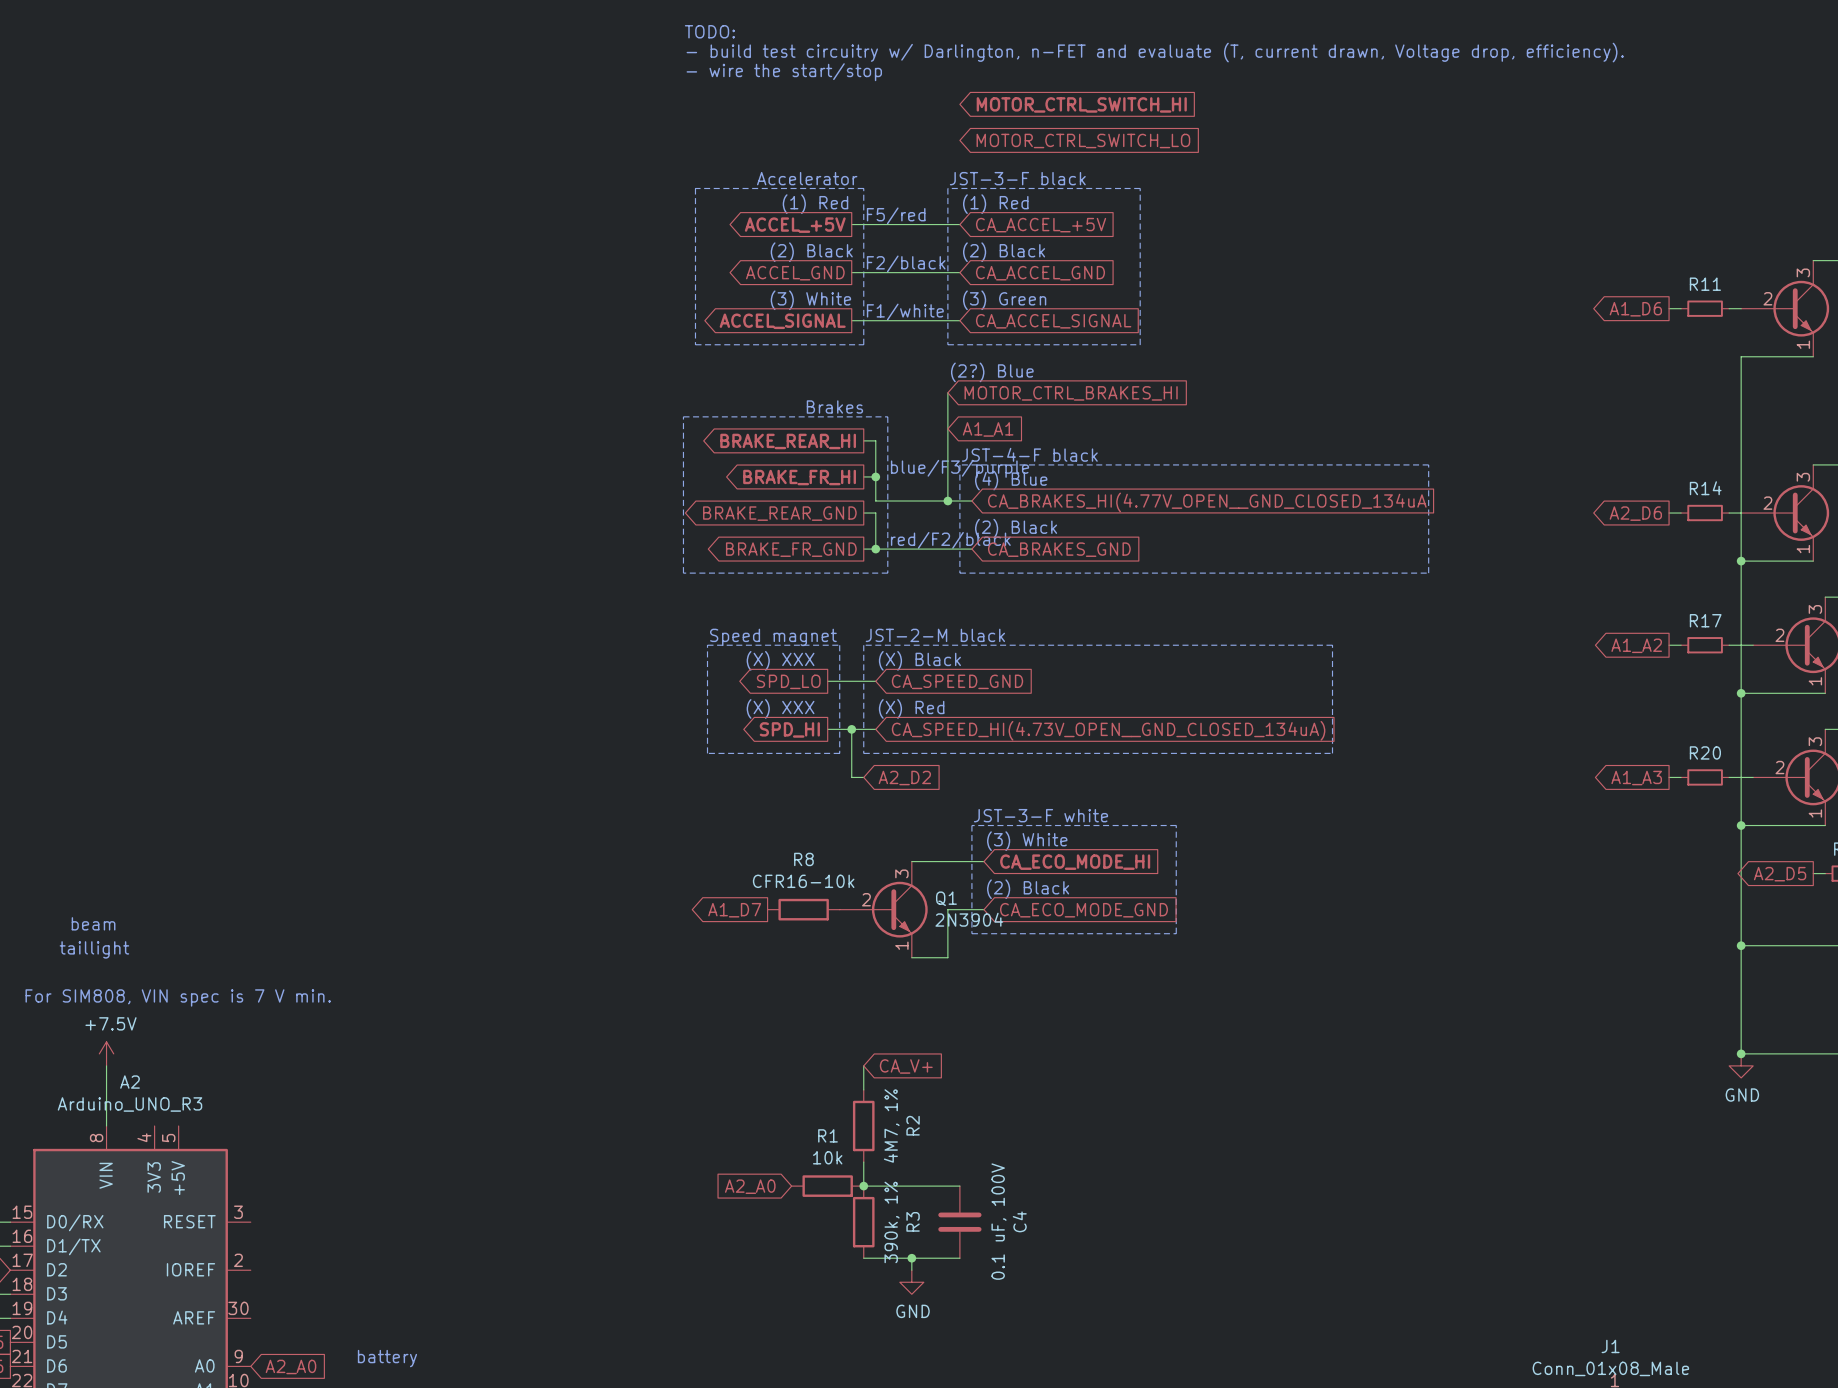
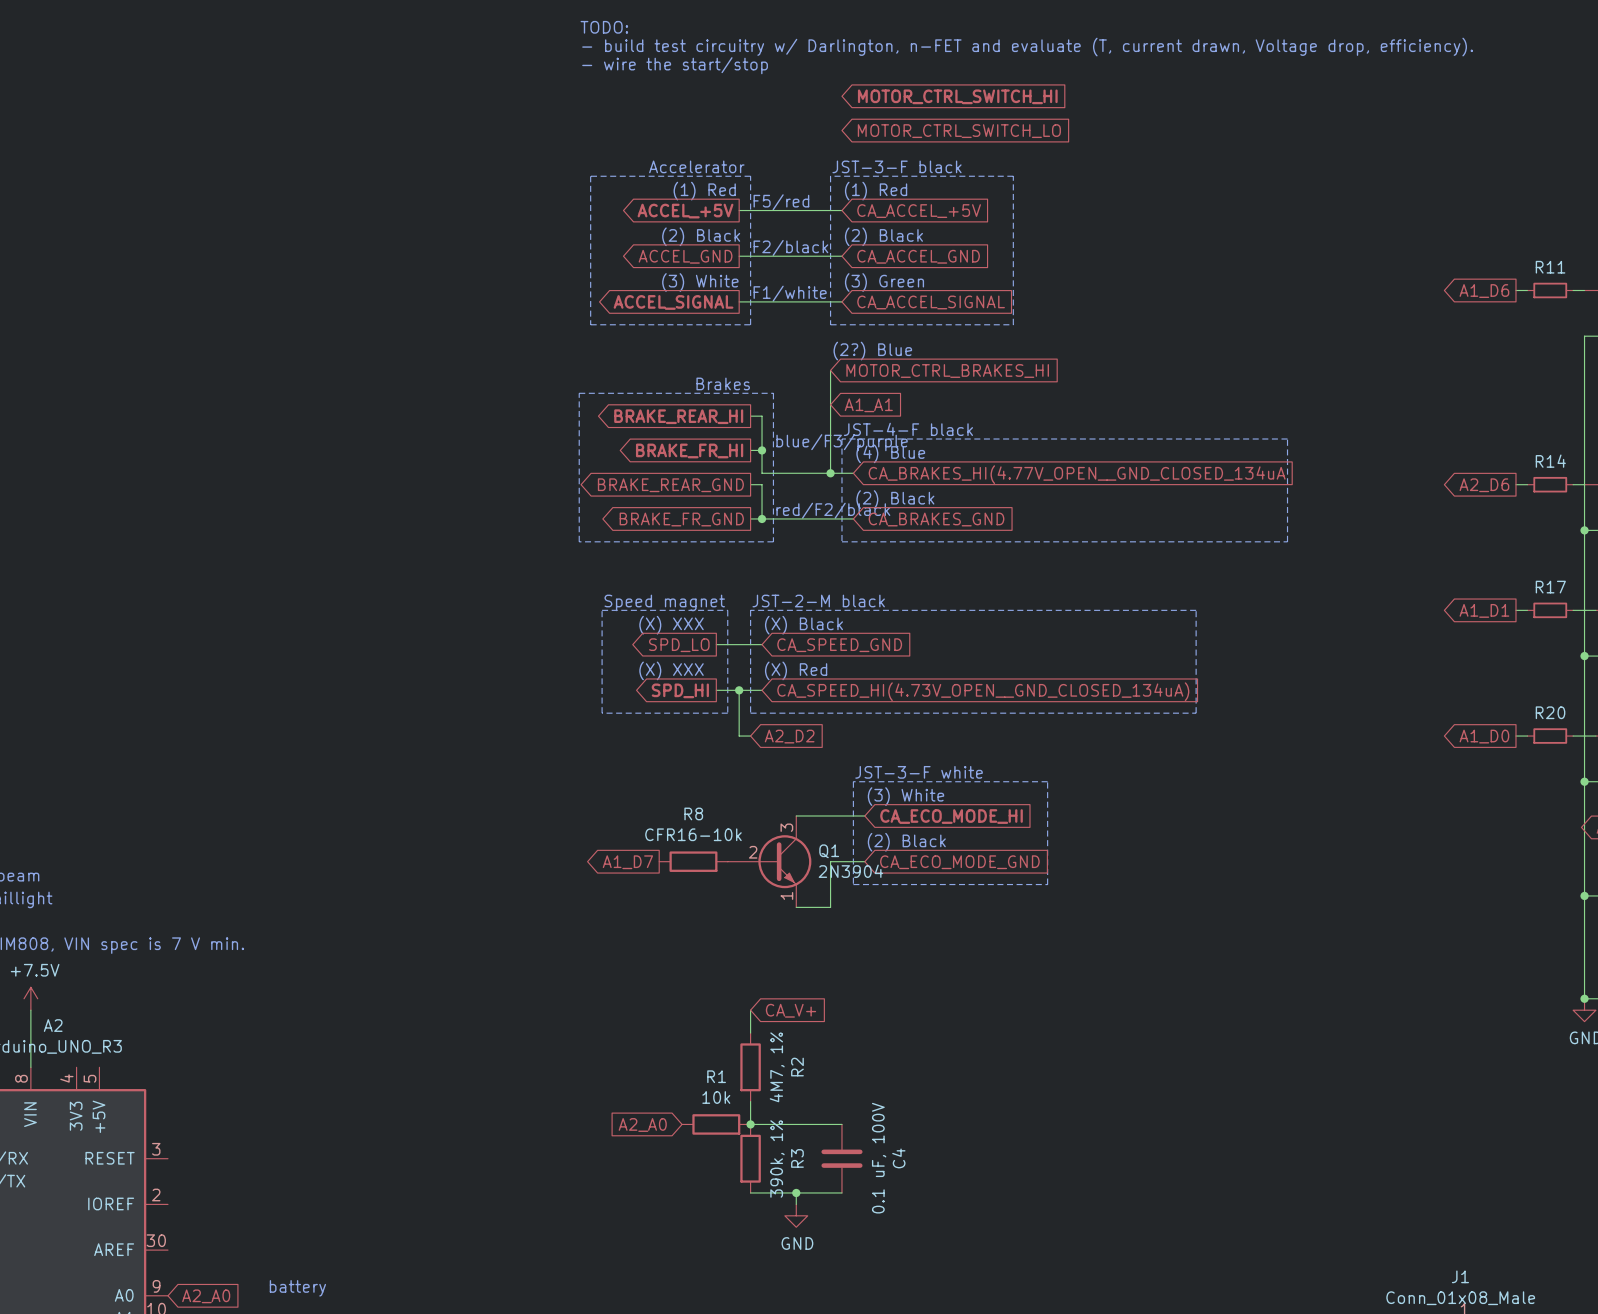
global label: A1_A2 (1636, 645) -> A1_D1 (1484, 610)
global label: A1_A3 (1636, 778) -> A1_D0 (1484, 736)

